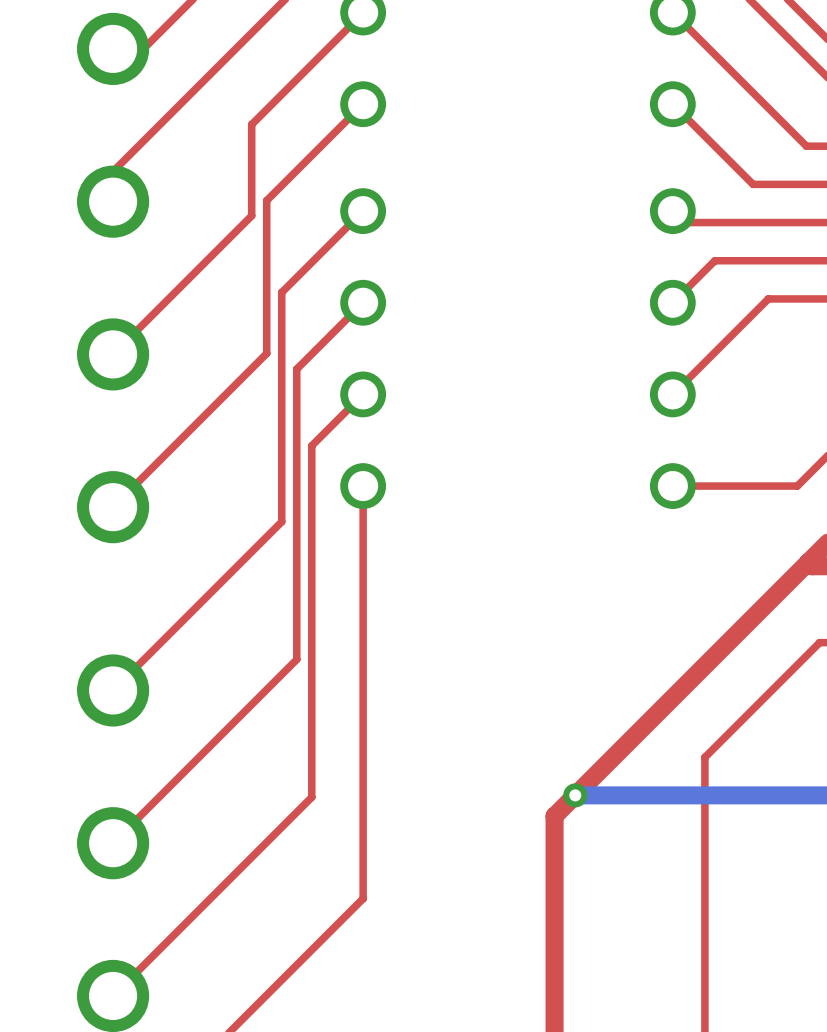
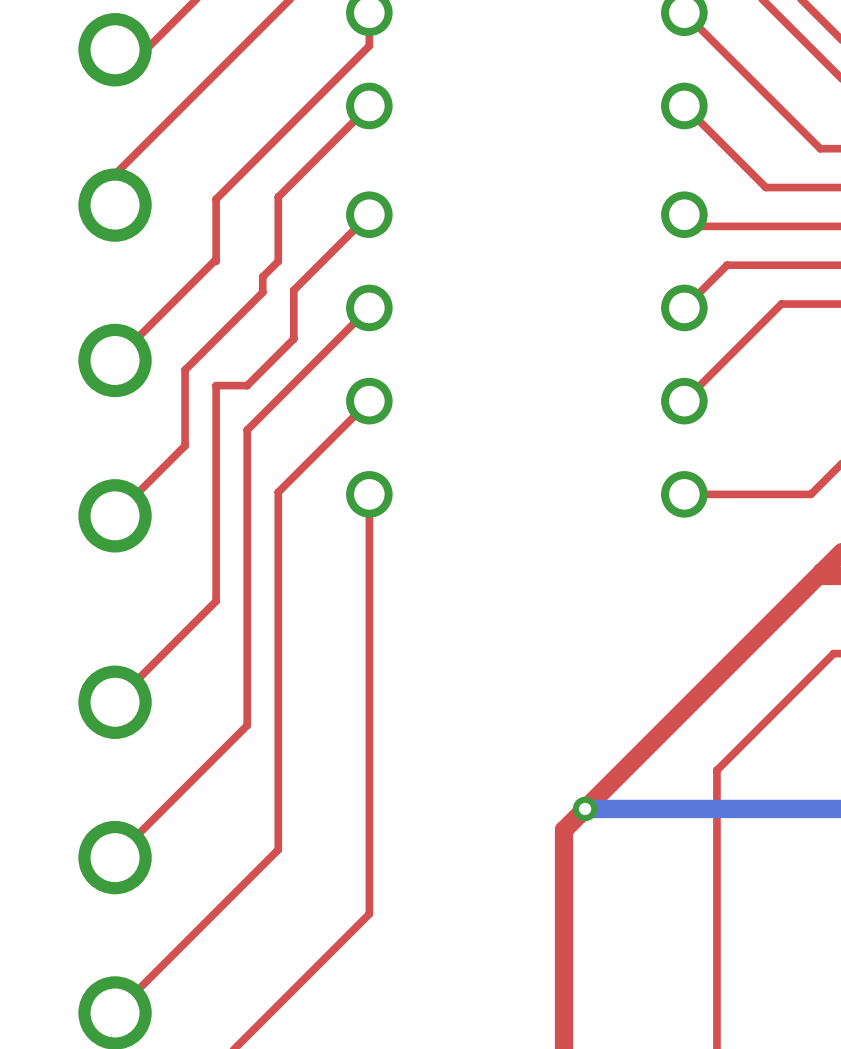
top track: (363, 13) (251, 124) (251, 215) (210, 256) -> (369, 13) (369, 45) (216, 199) (216, 261) (214, 261)
top track: (273, 193) (266, 200) (266, 353) (181, 438) -> (278, 197) (278, 261) (262, 276) (262, 292) (185, 370) (185, 445)
top track: (288, 285) (281, 292) (281, 521) (212, 591) -> (293, 290) (293, 339) (247, 385) (216, 385) (216, 601)
top track: (296, 369) (296, 659) (243, 713) -> (301, 375) (247, 430) (247, 725)
top track: (311, 445) (311, 797) (273, 835) -> (317, 453) (278, 492) (278, 849)

